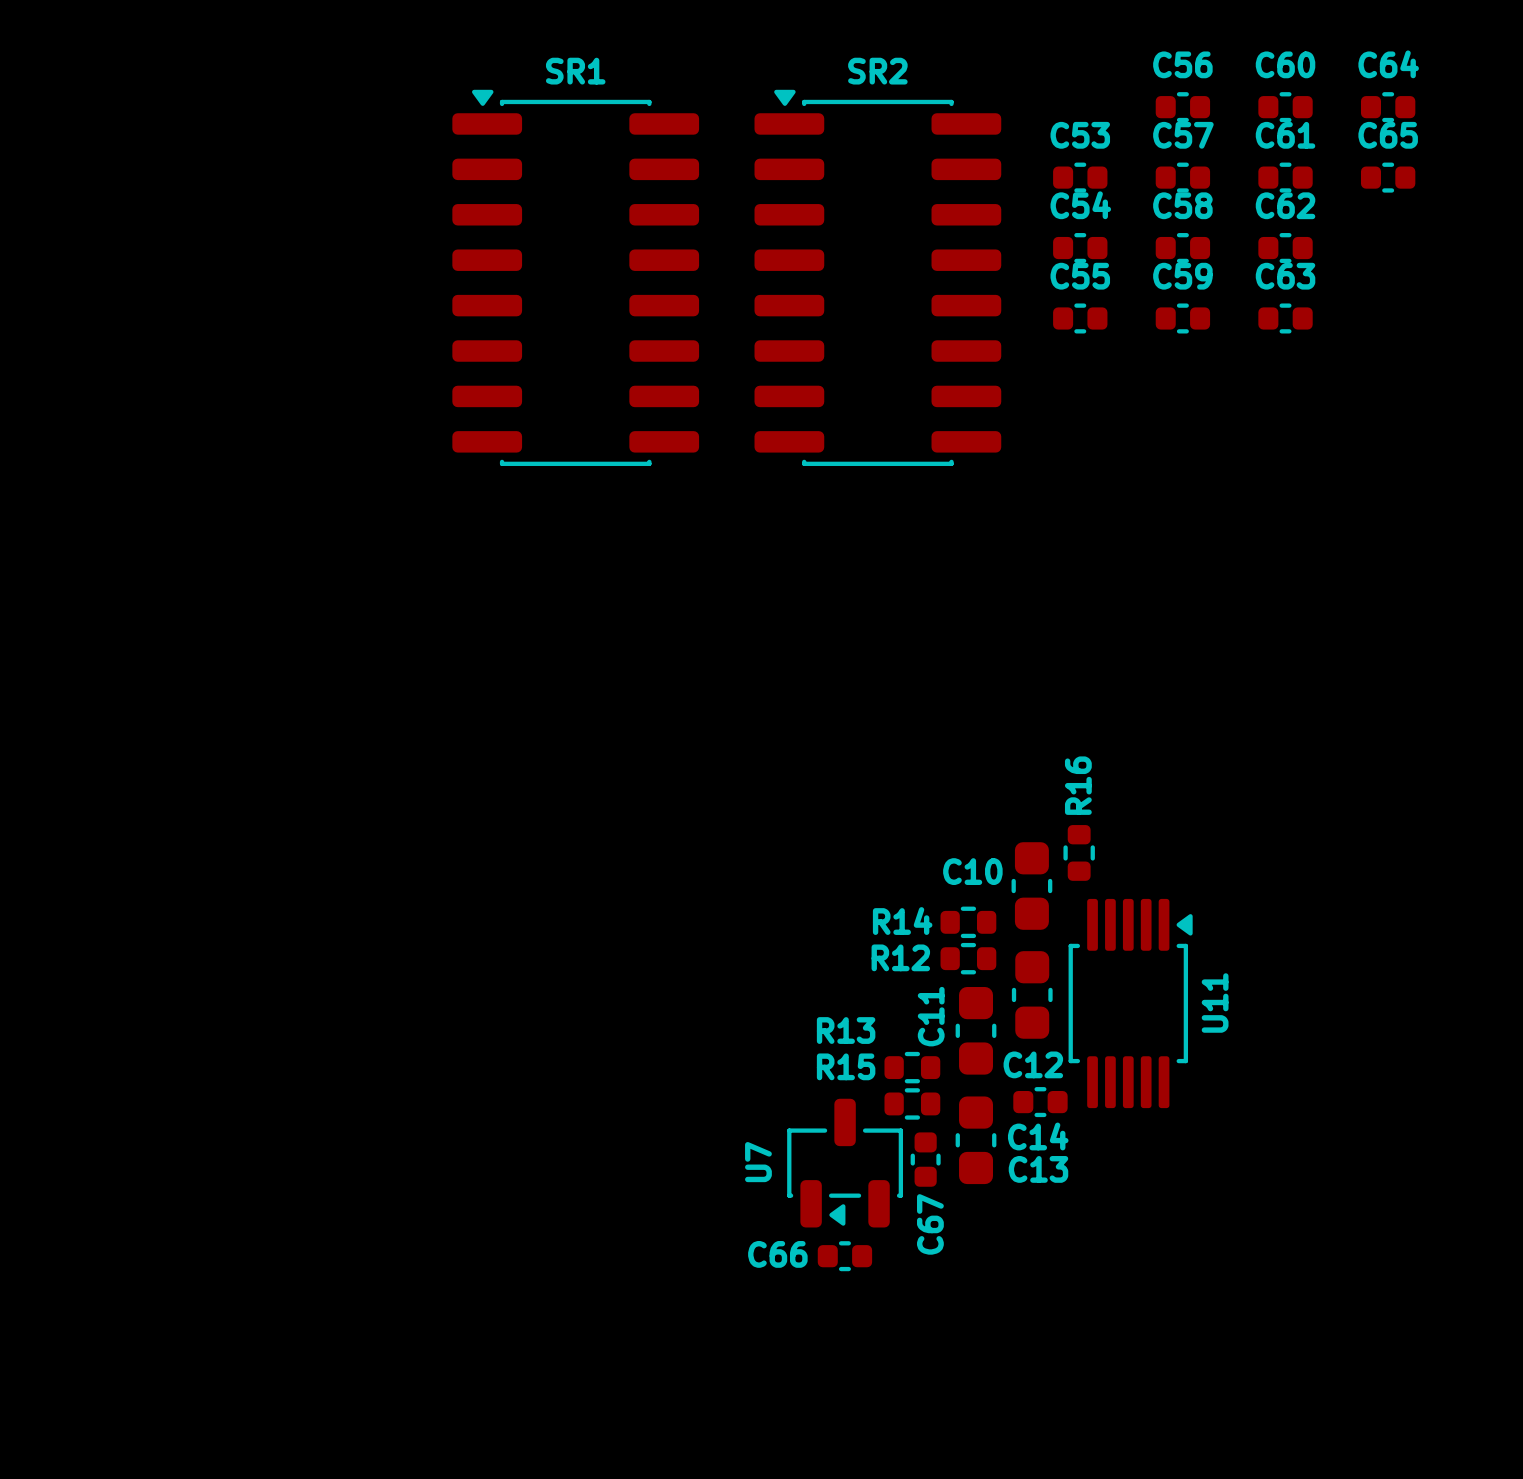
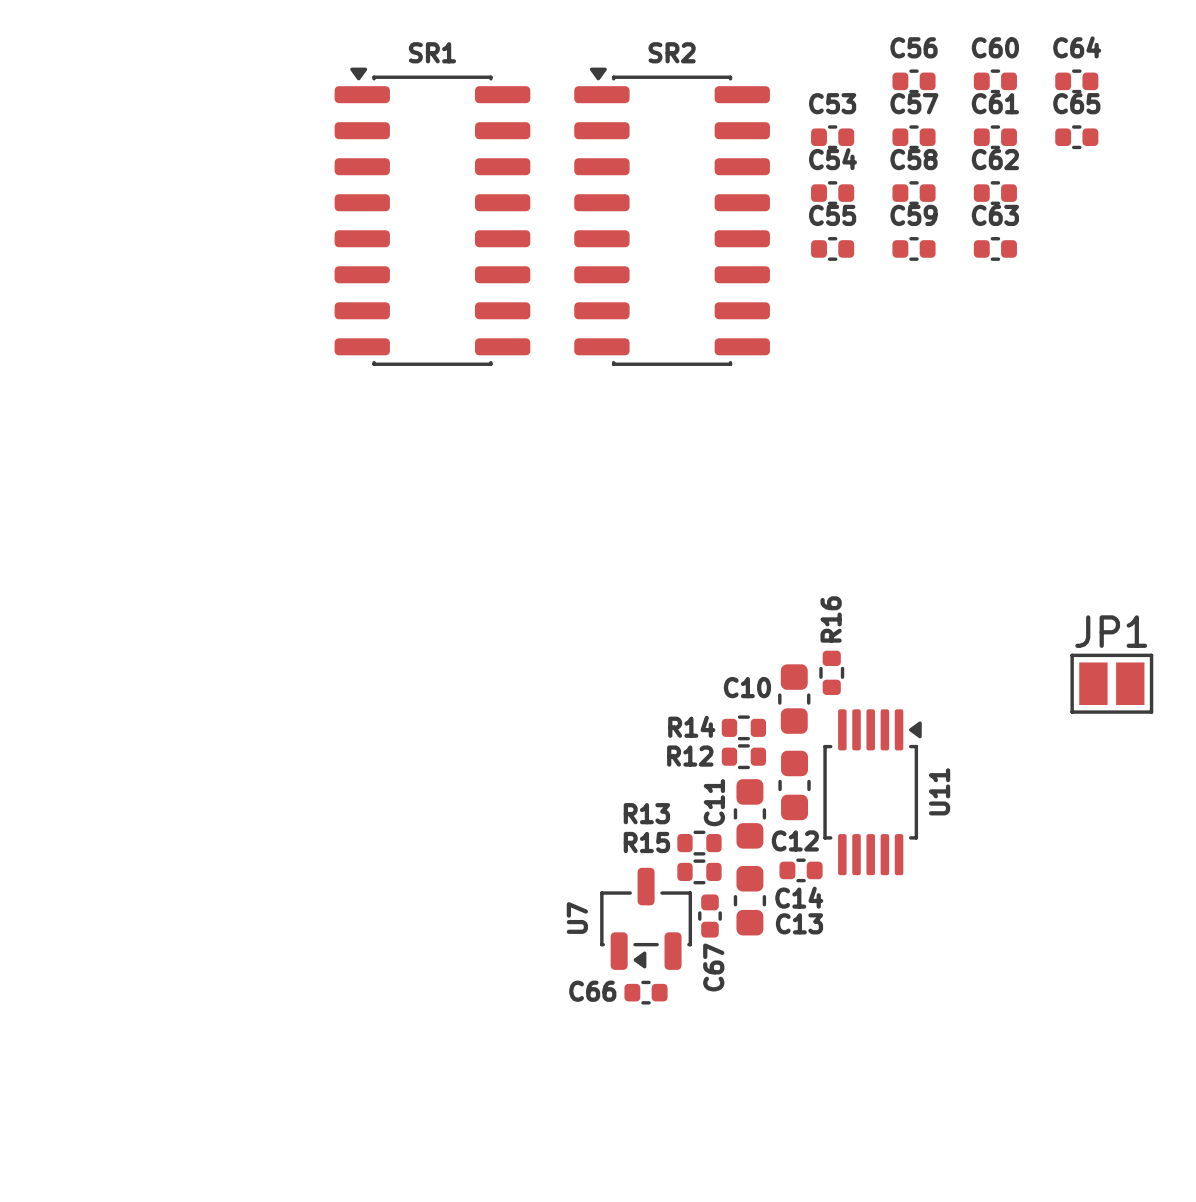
JP1: none -> (1111, 683)

